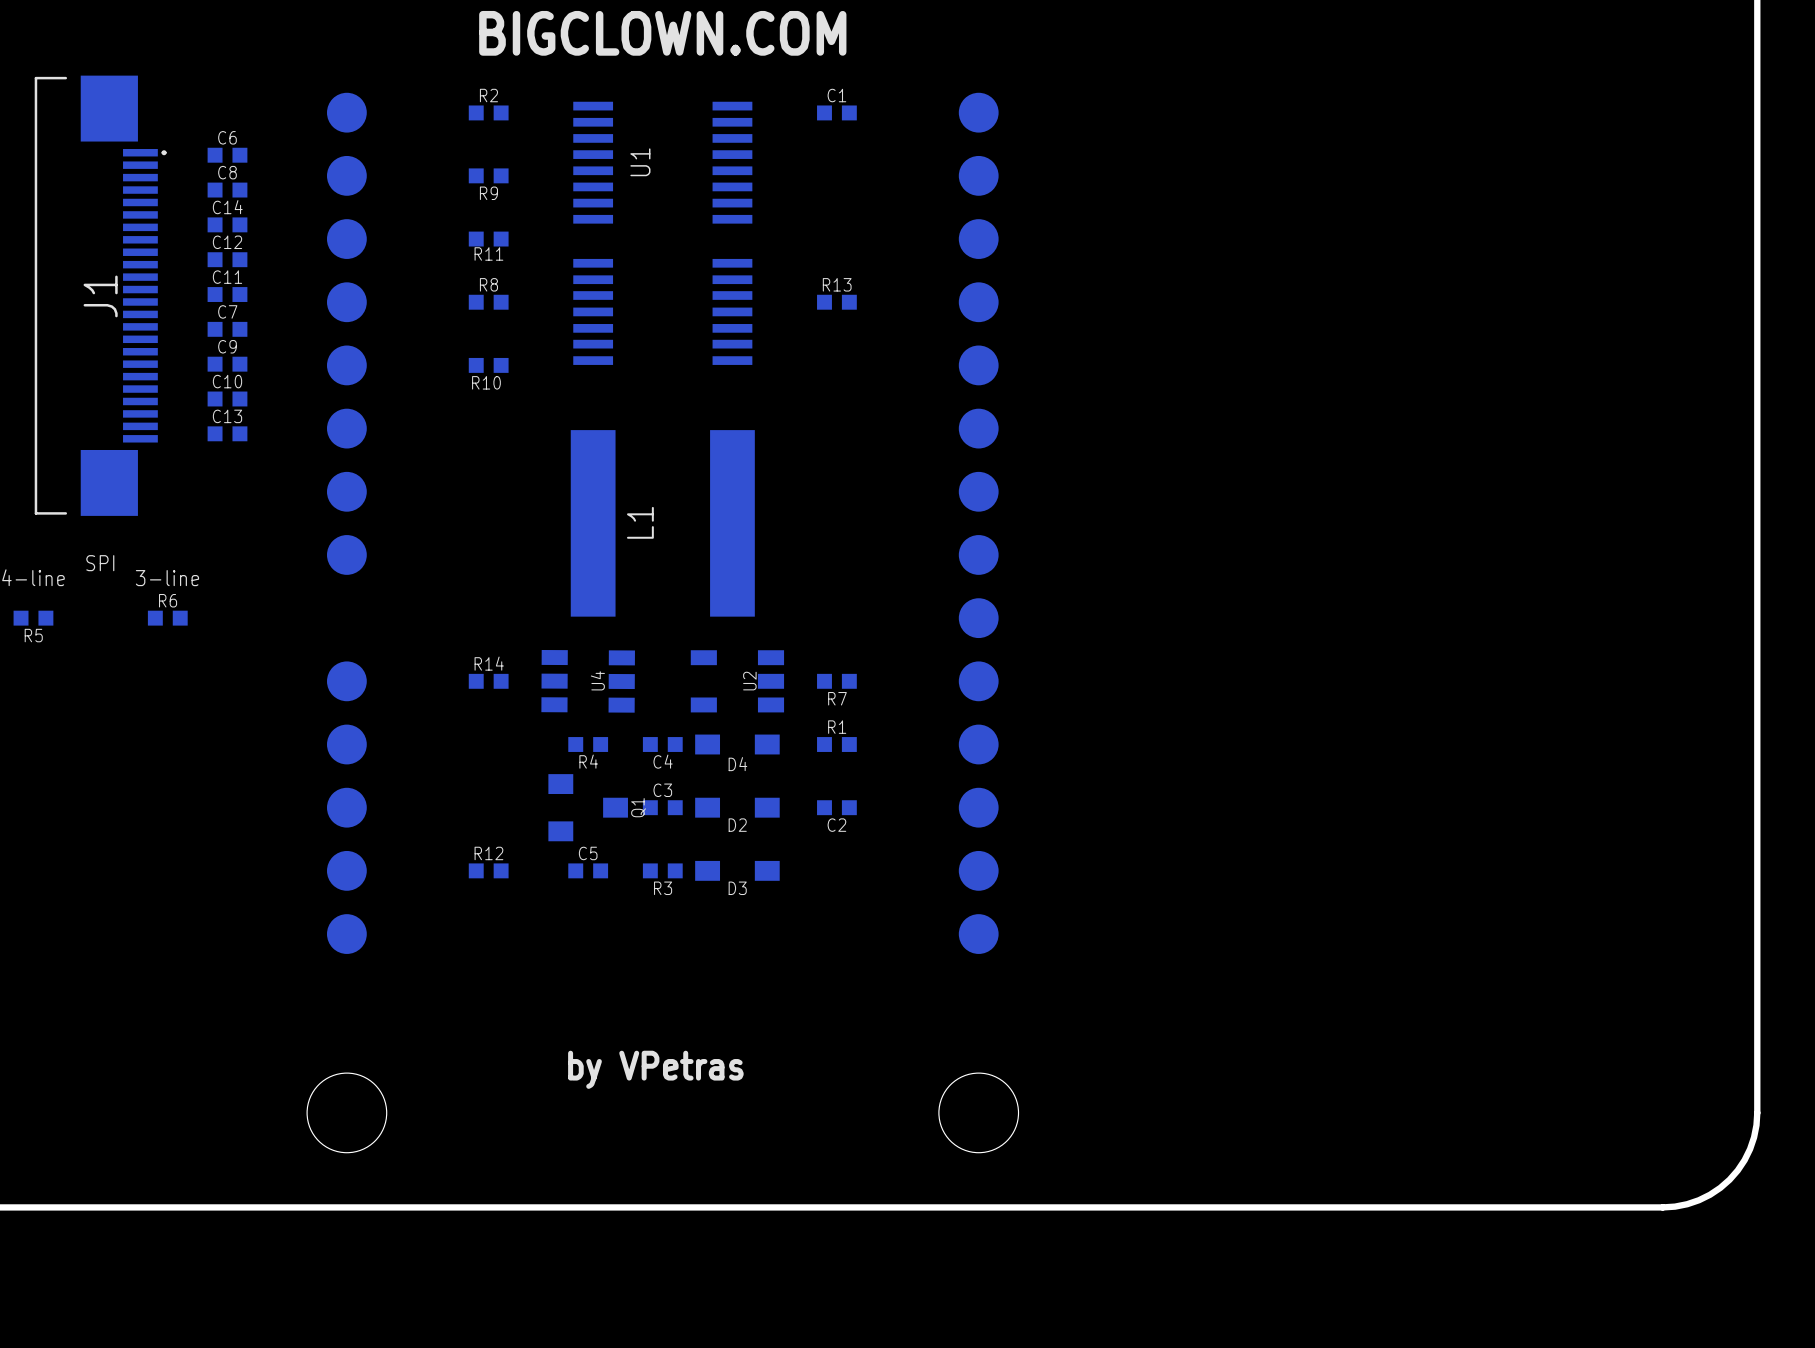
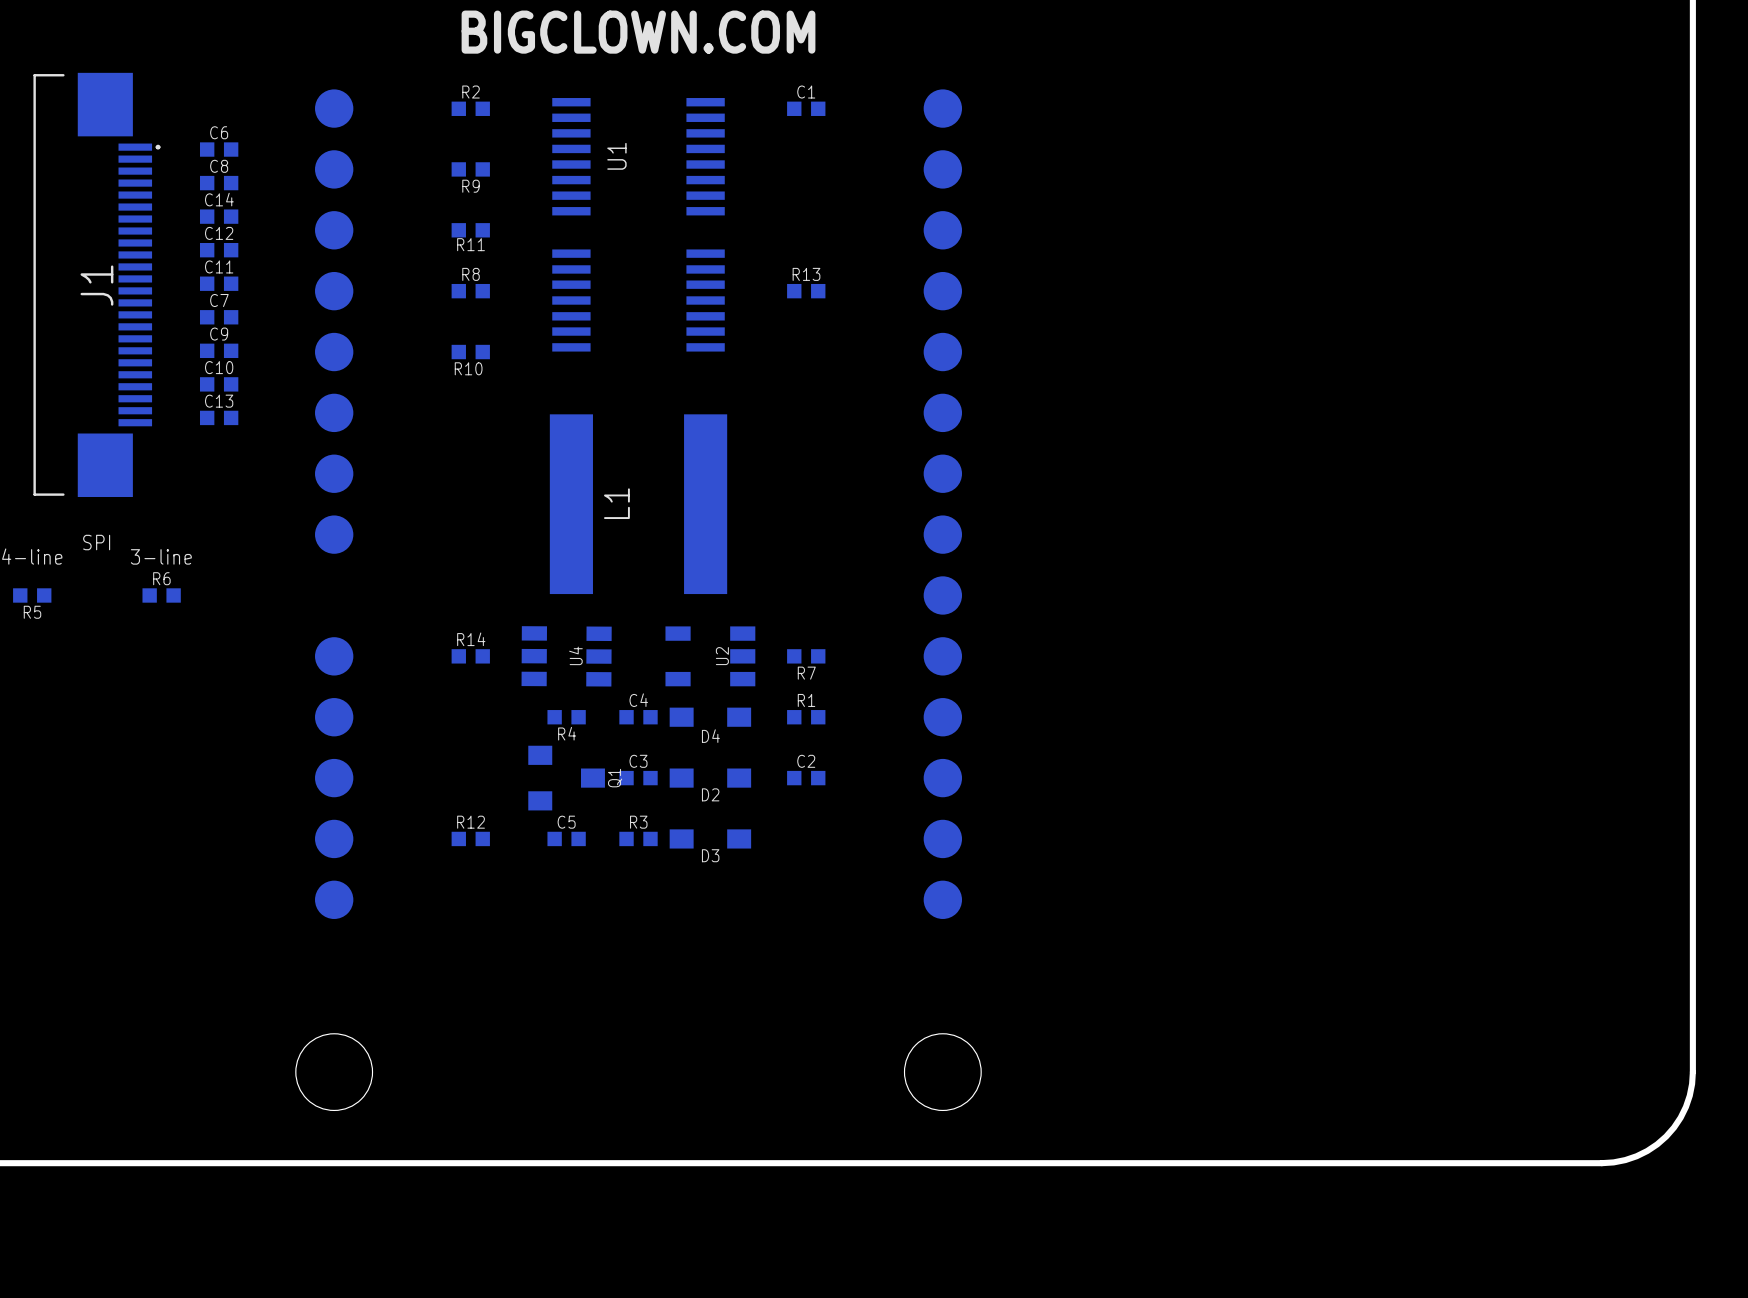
C4 name position: C4 (663, 761) -> C4 (638, 700)
C2 name position: C2 (836, 825) -> C2 (806, 761)
R3 name position: R3 (663, 888) -> R3 (638, 822)
text: by VPetras (655, 1069) -> none

